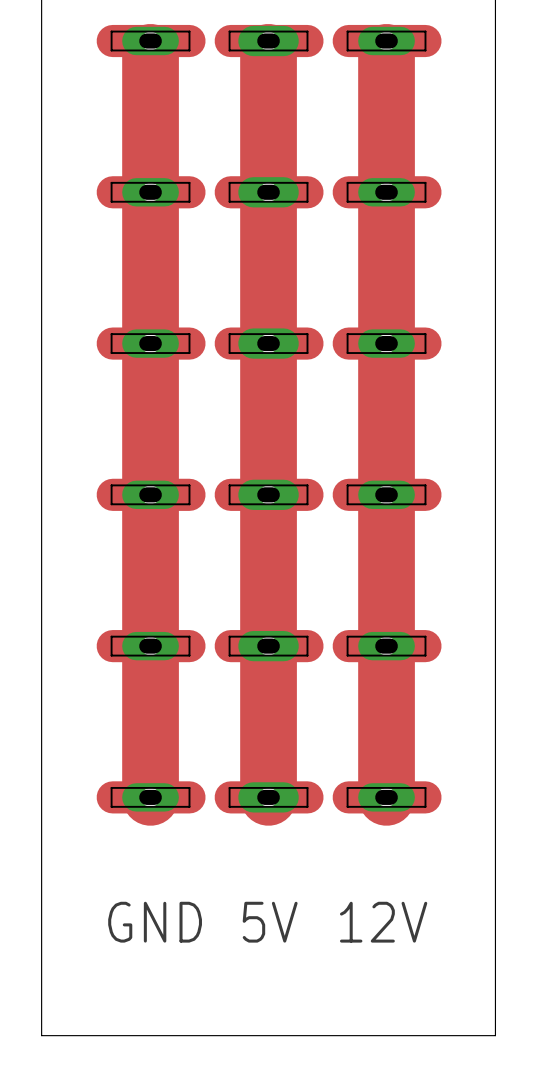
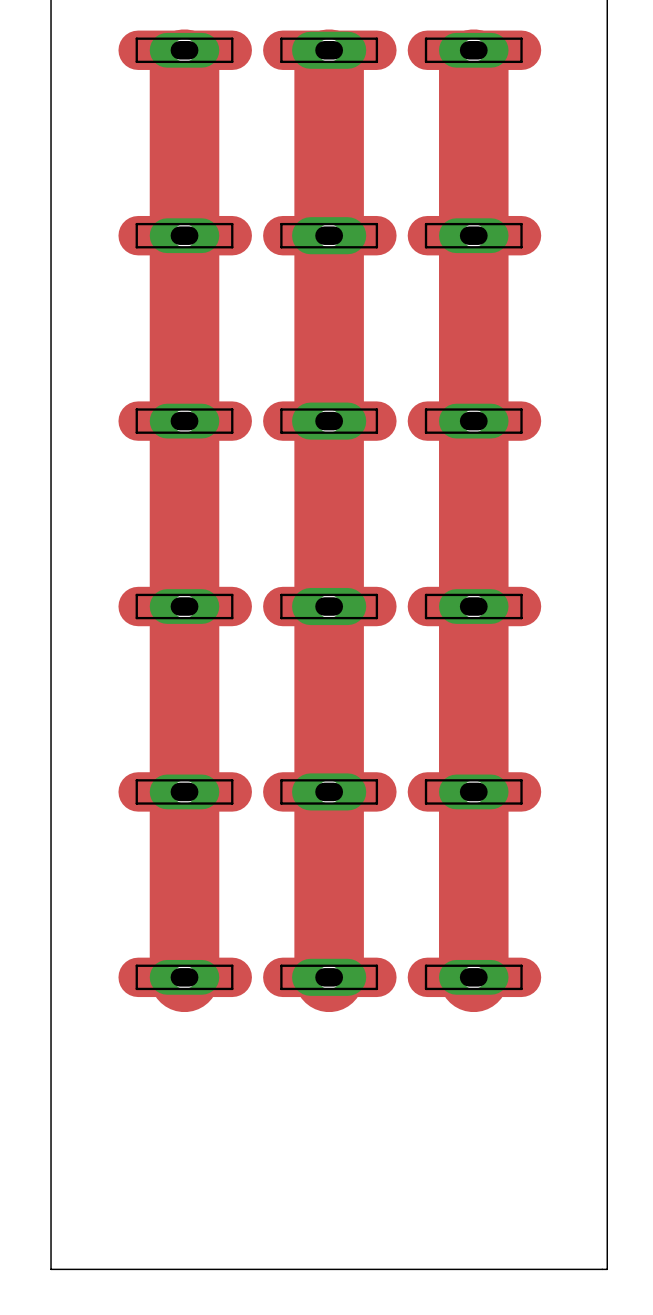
text: GND (155, 922) -> none
text: 5V (270, 922) -> none
text: 12V (383, 922) -> none

